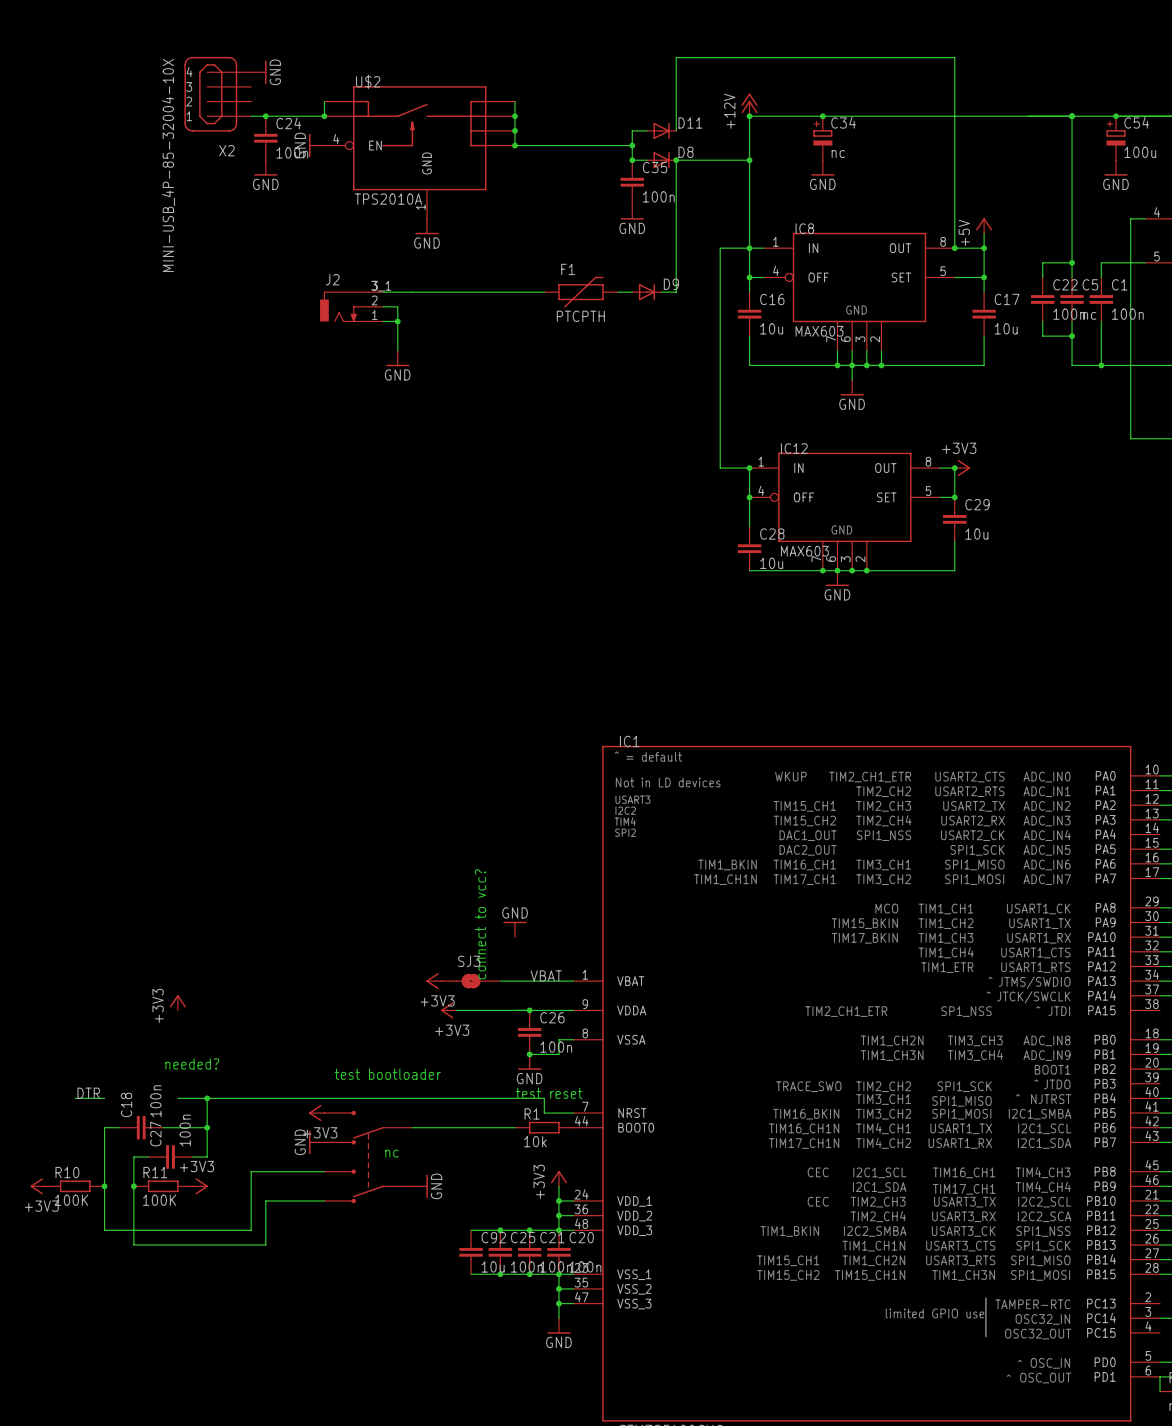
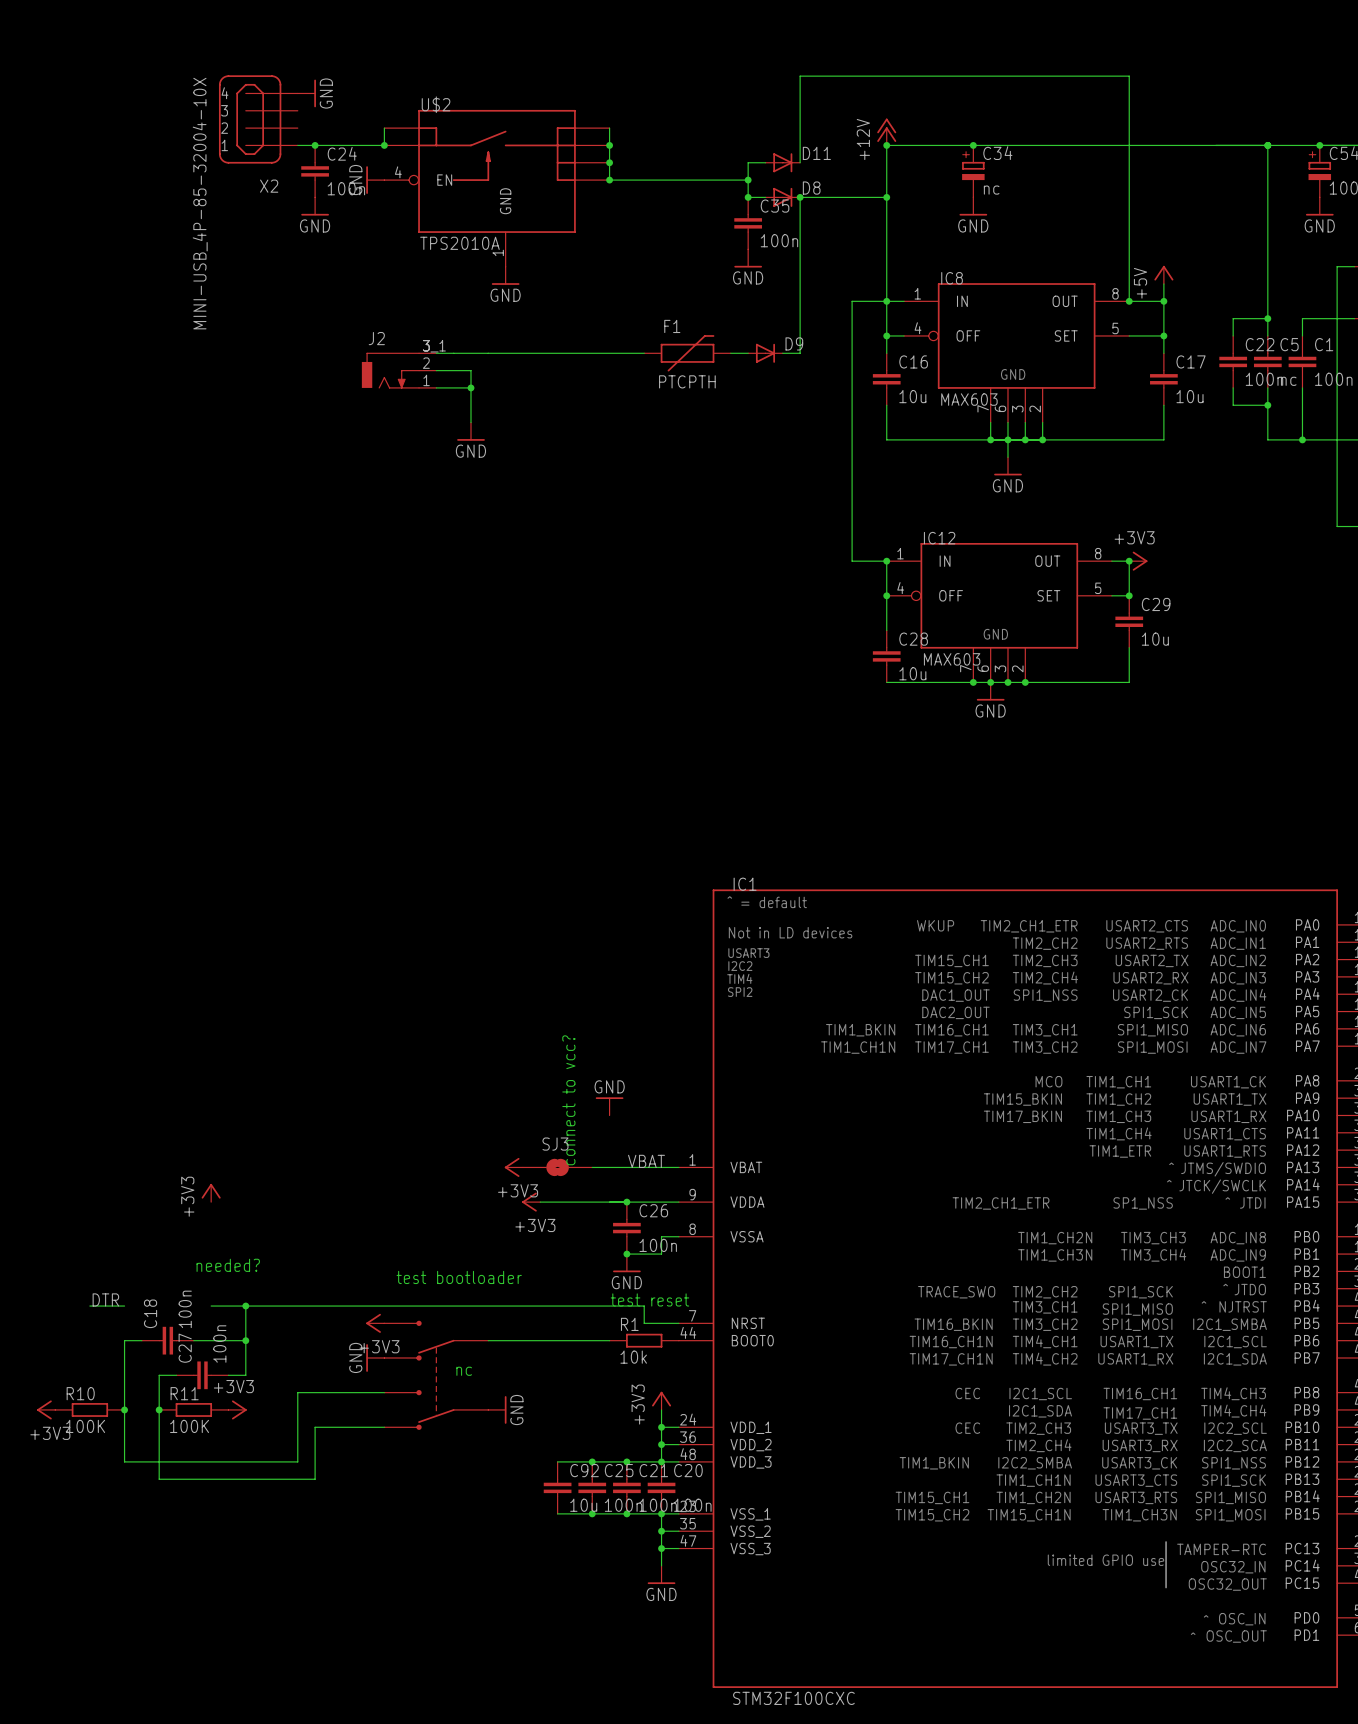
J2 position: (351, 306) -> (399, 370)

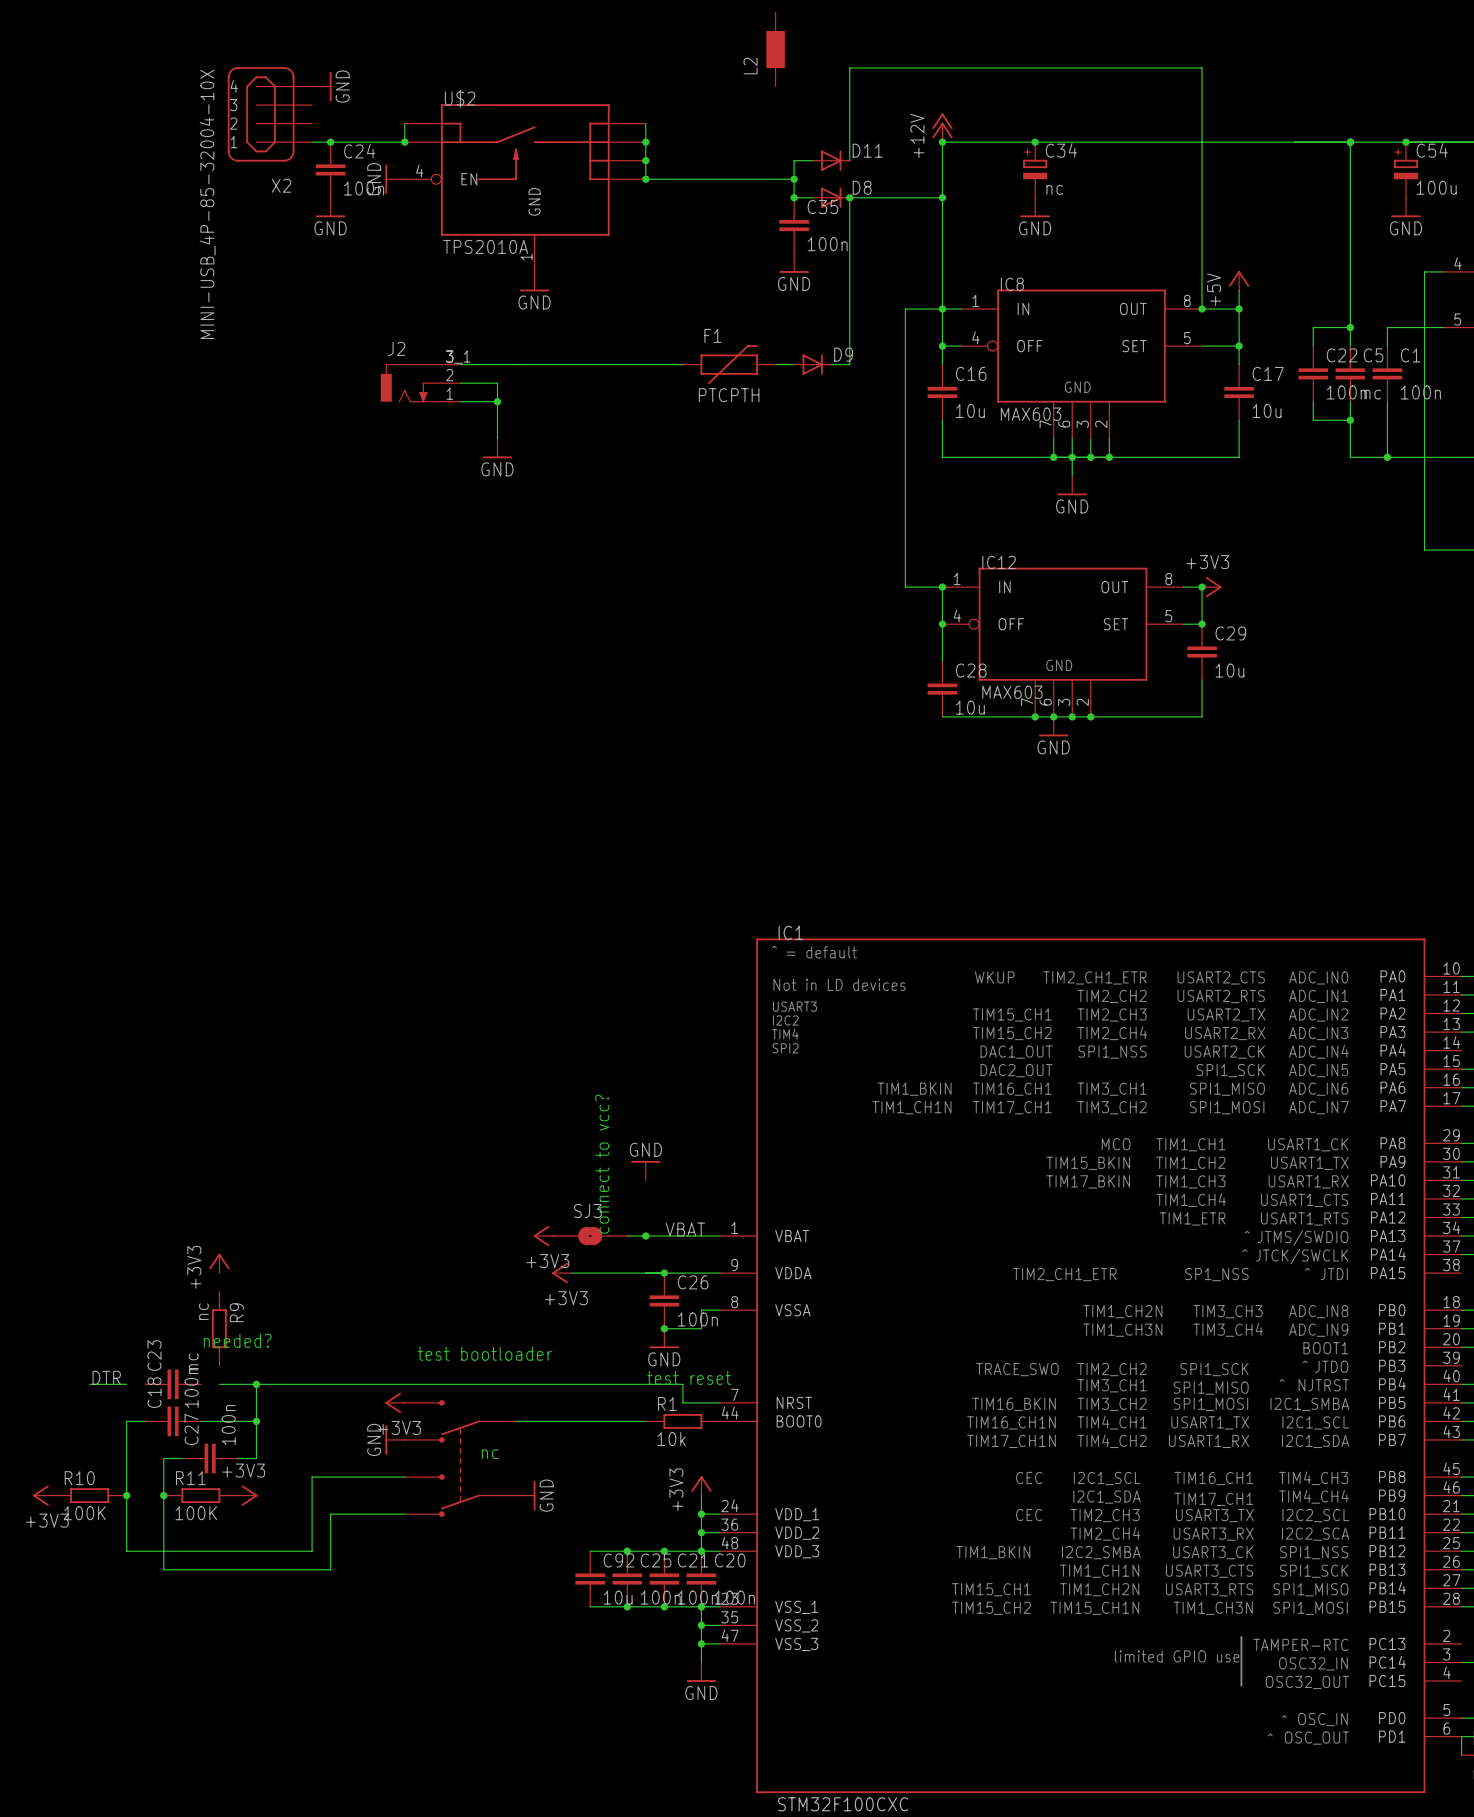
L2: none -> (775, 49)
junction: none -> (645, 1236)
R9: none -> nc (219, 1328)
C23: none -> nc (173, 1384)

